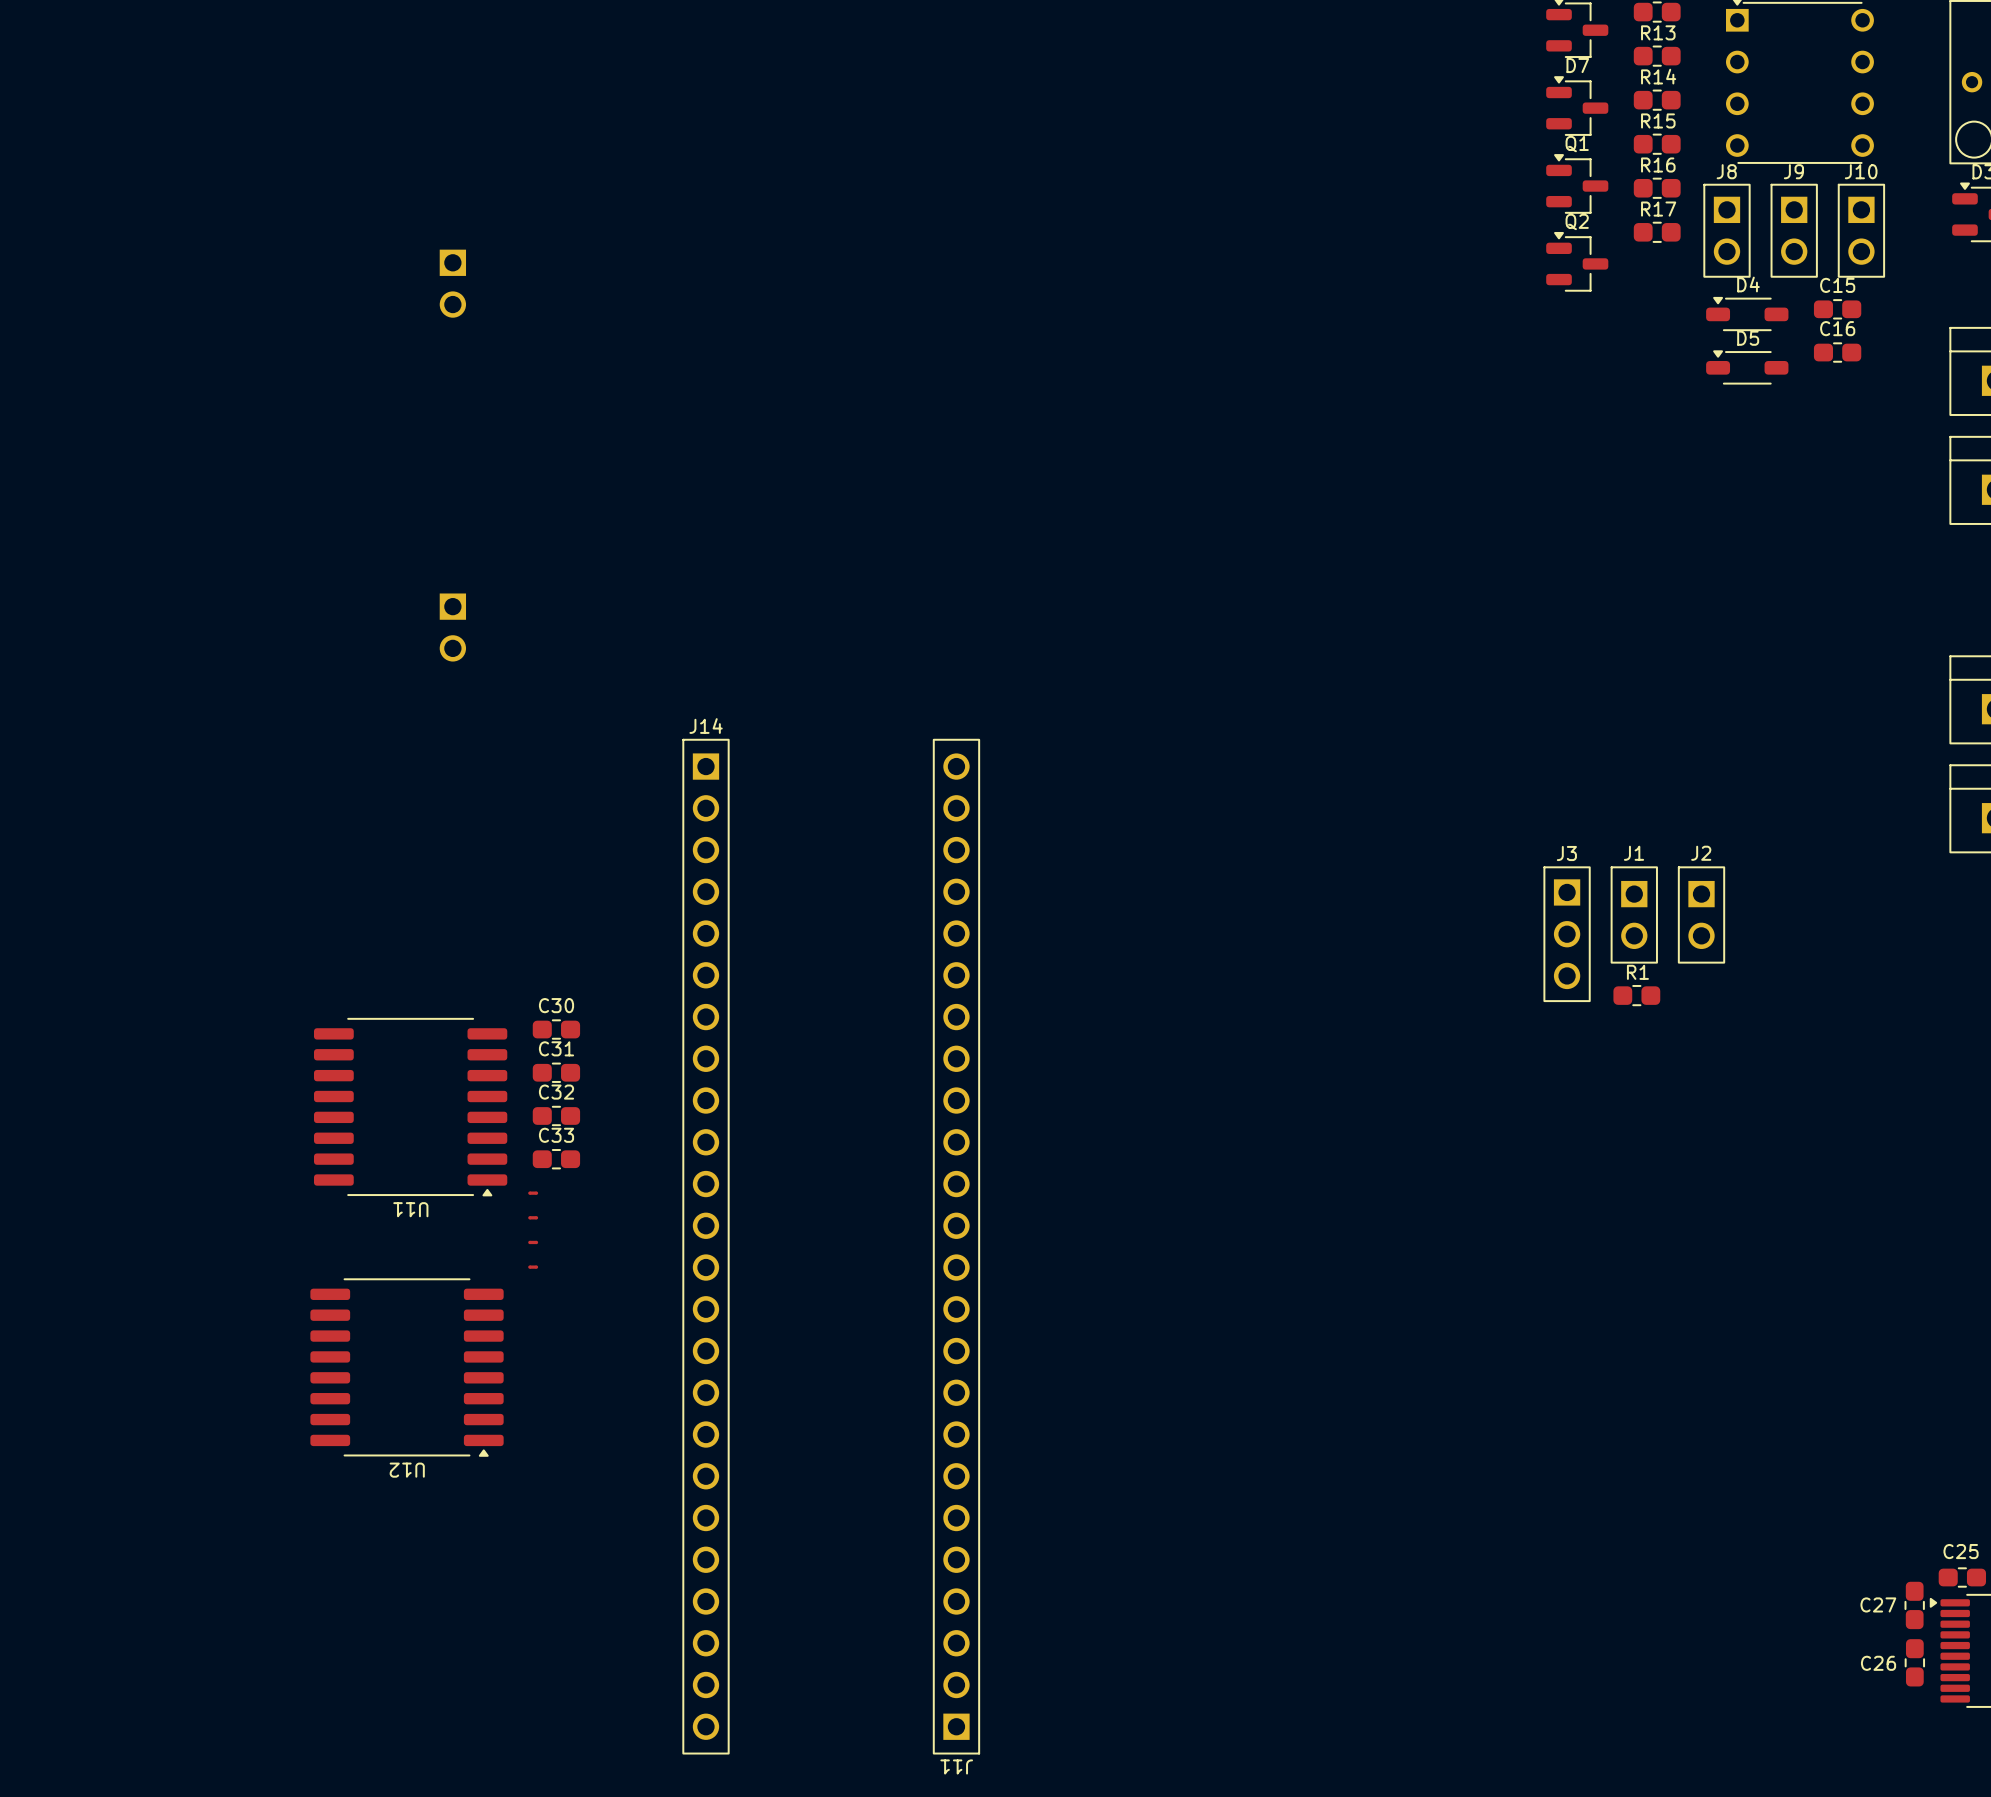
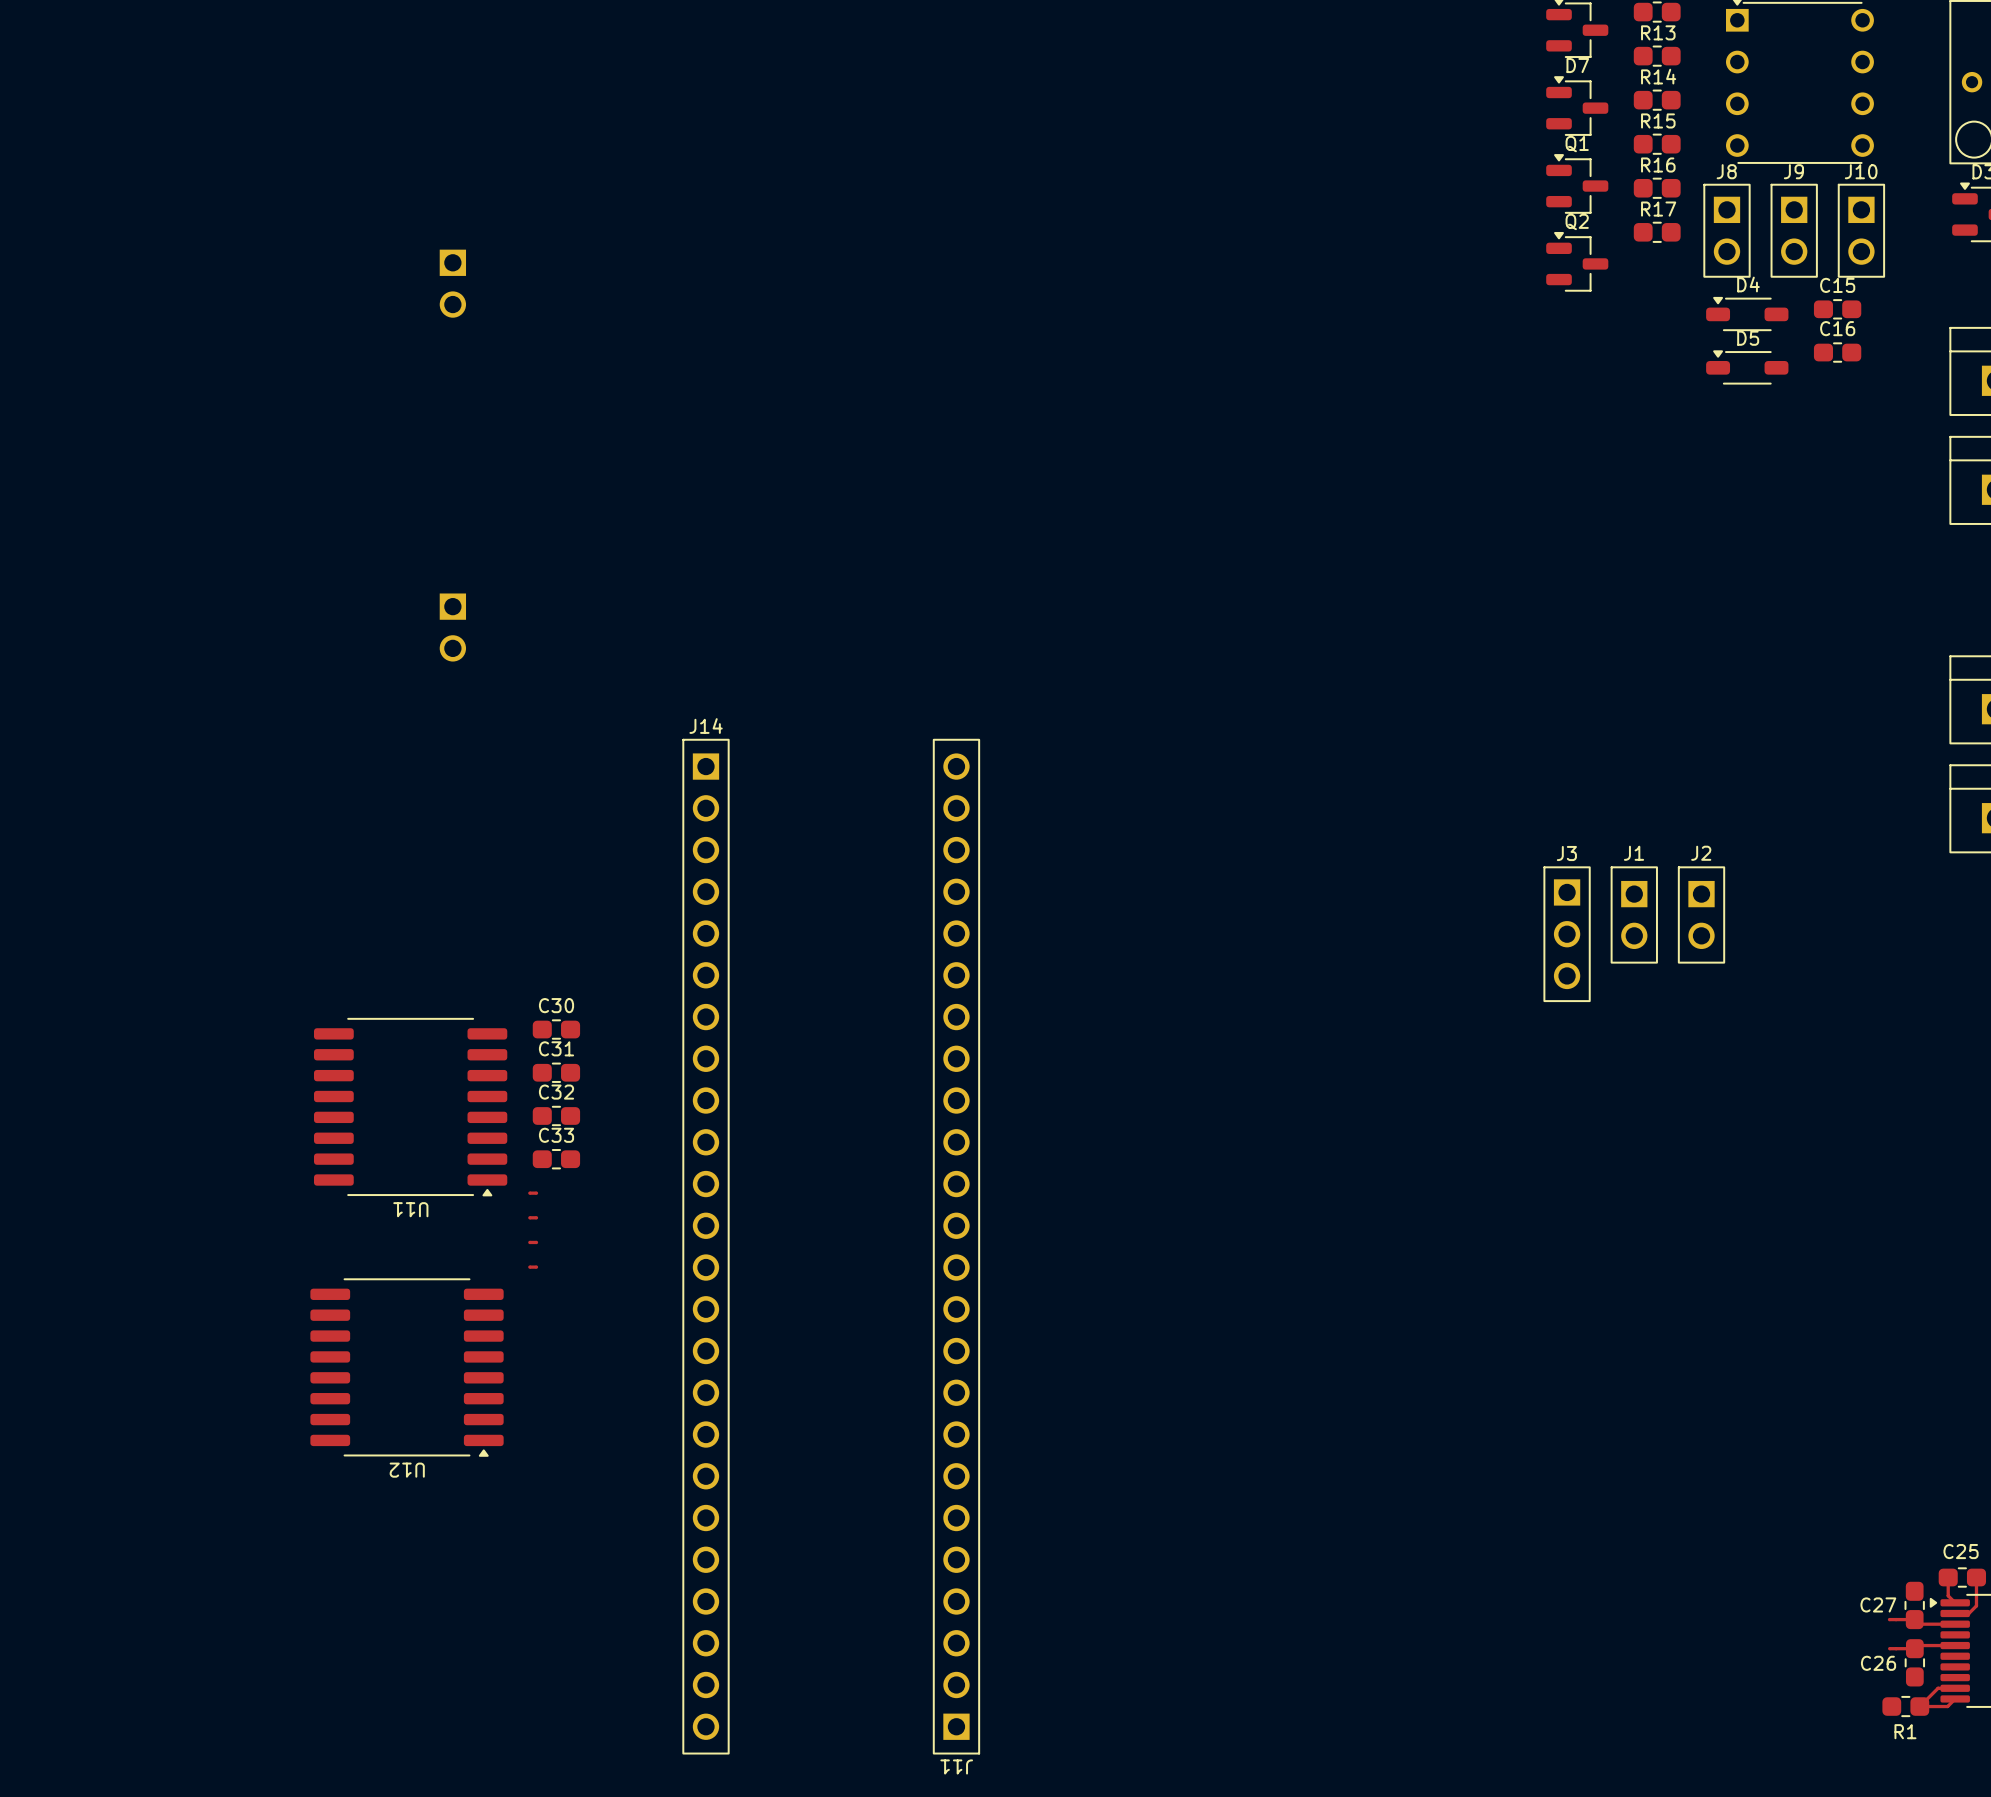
R1 name position: R1 (1637, 972) -> R1 (1905, 1731)
R1 position: (1636, 995) -> (1905, 1706)
track: none -> (1948, 1577) (1948, 1595) (1955, 1602)
track: none -> (1976, 1577) (1976, 1605) (1968, 1613) (1955, 1613)
part: none -> (1892, 1619)
track: none -> (1896, 1619) (1914, 1619) (1919, 1624) (1955, 1624)
track: none -> (1955, 1645) (1917, 1645) (1914, 1648) (1896, 1648)
part: none -> (1892, 1648)
track: none -> (1955, 1688) (1938, 1688) (1919, 1706) (1947, 1706) (1955, 1698)

